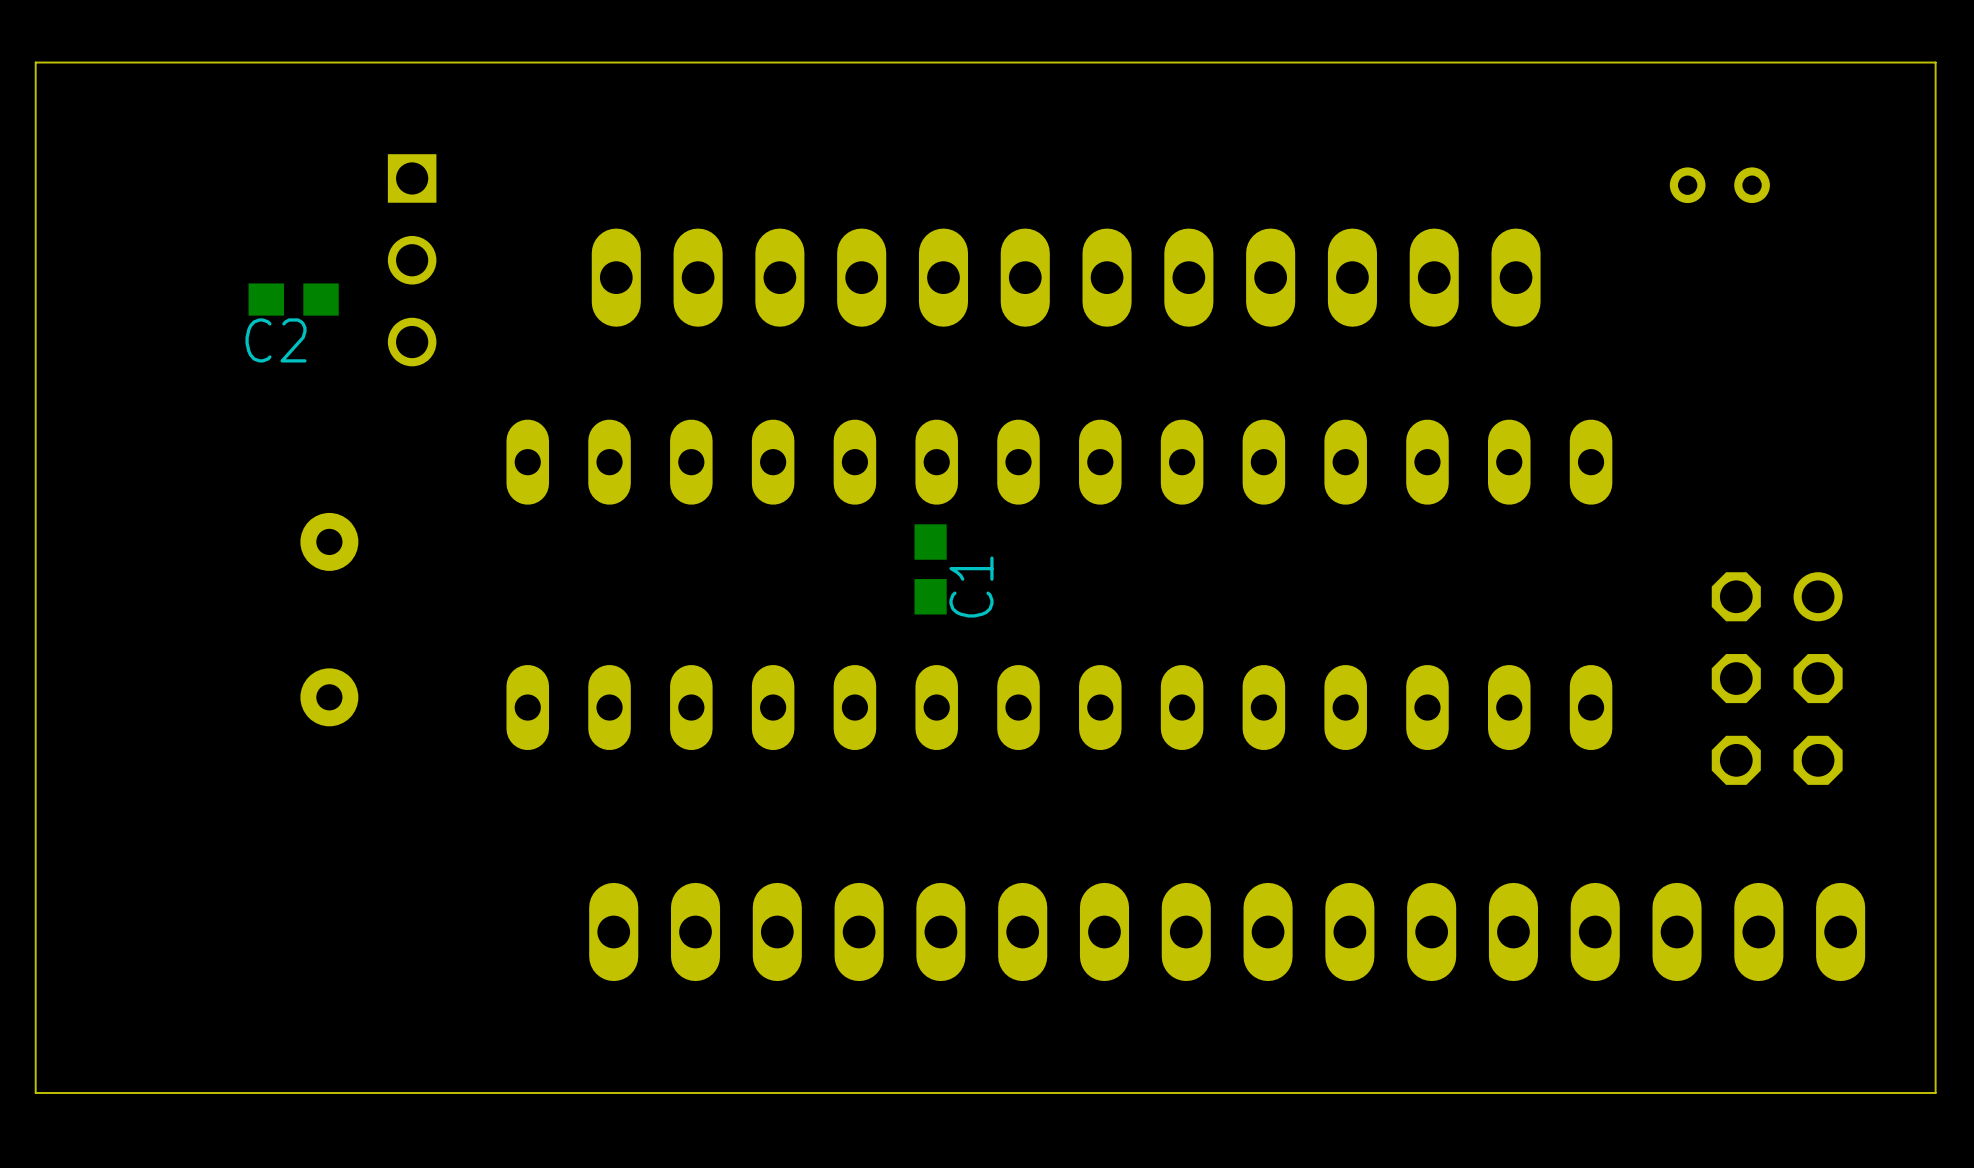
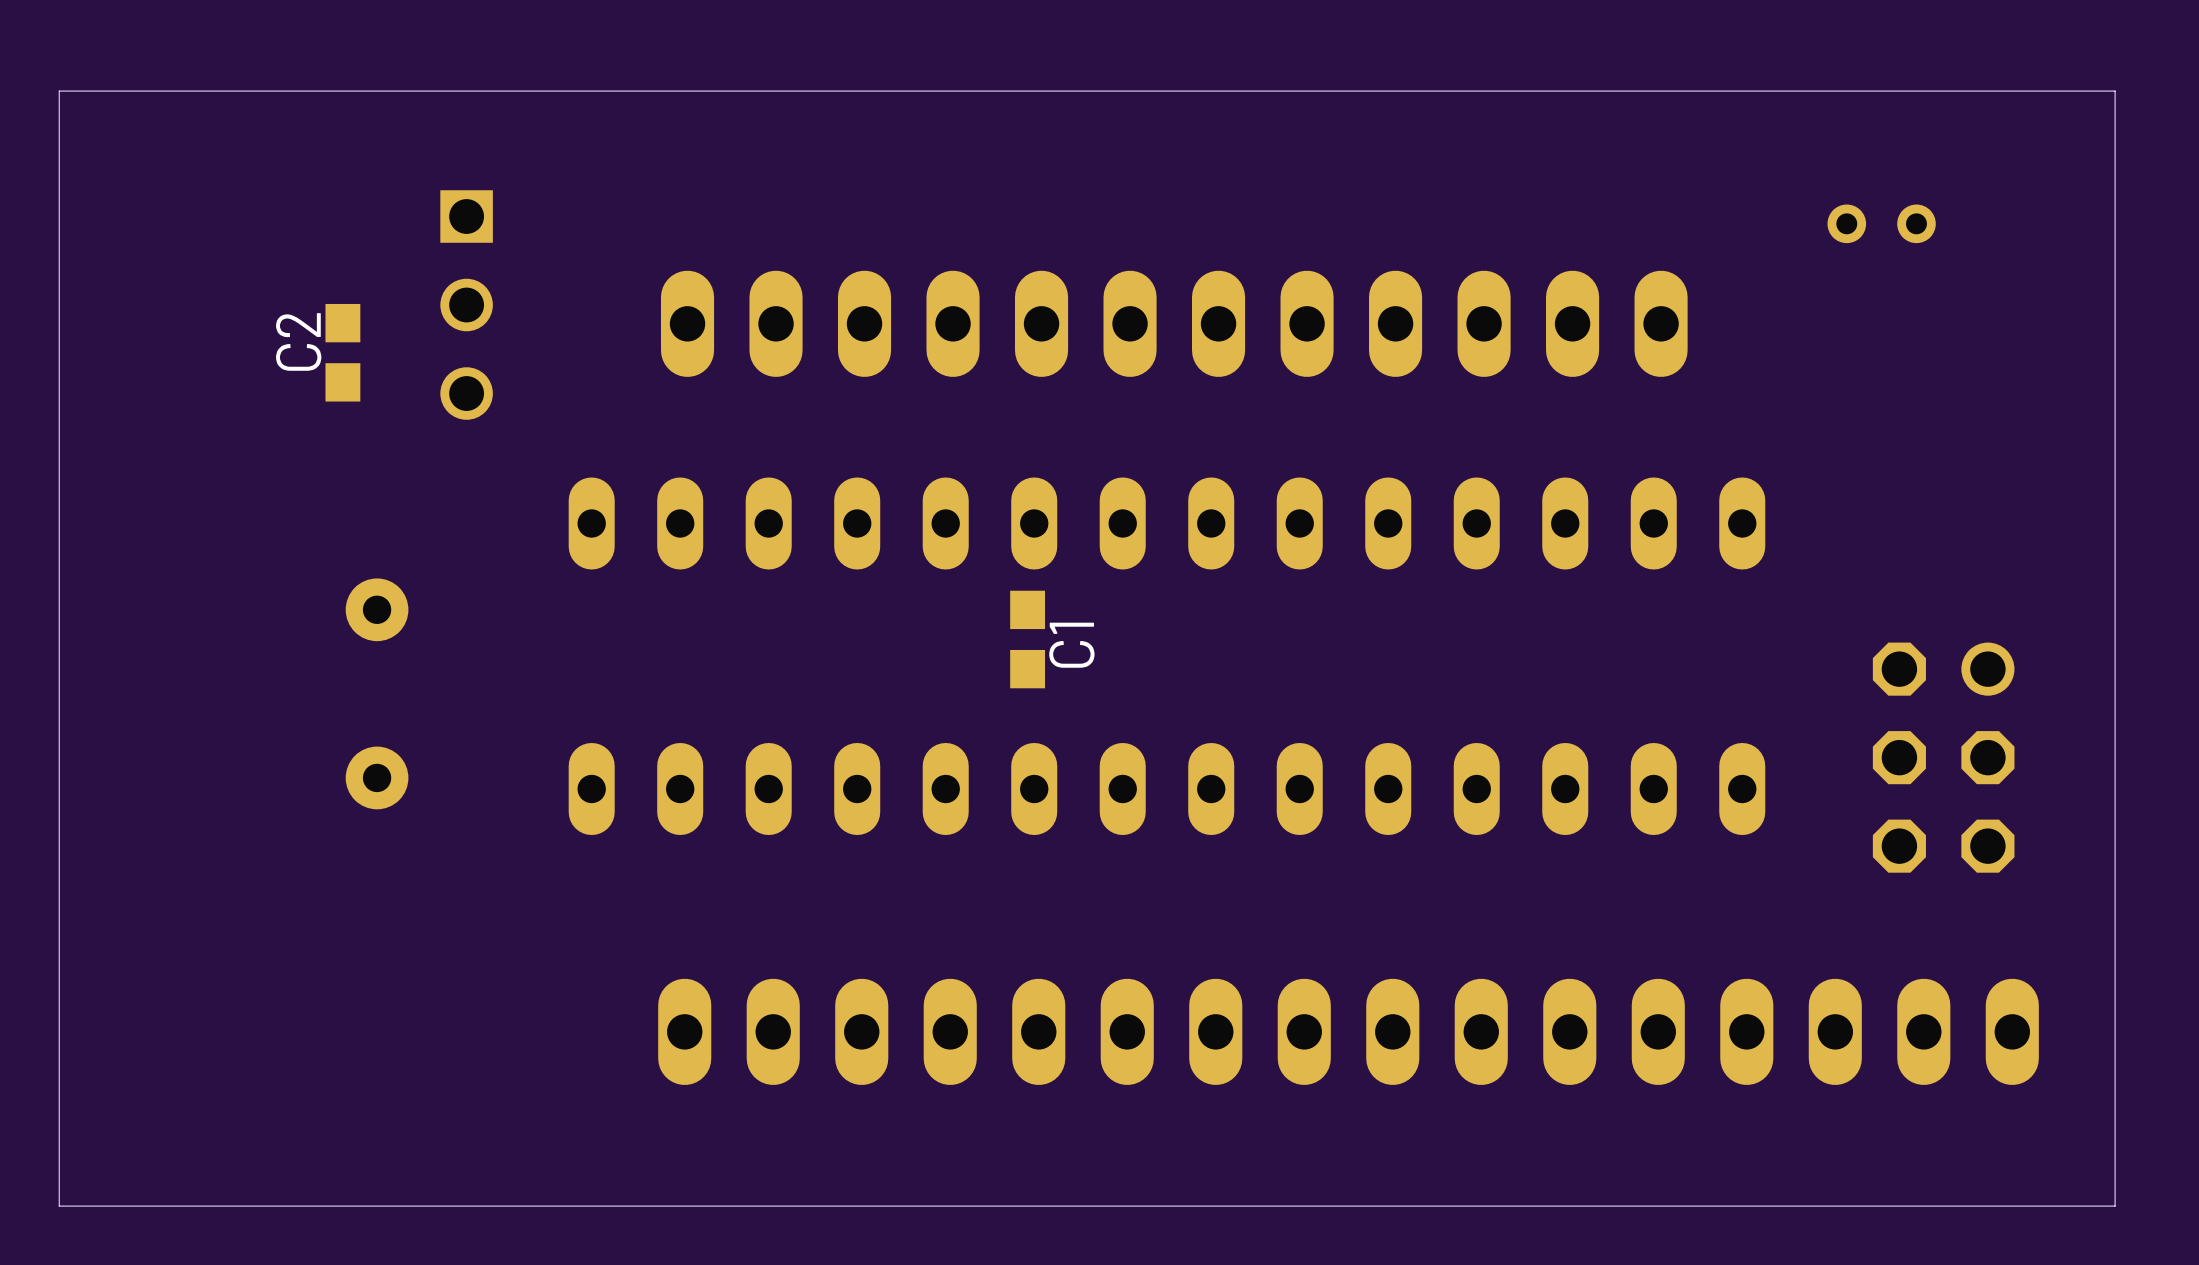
C2 rotation: 0° (293, 299) -> 90° clockwise (342, 352)

